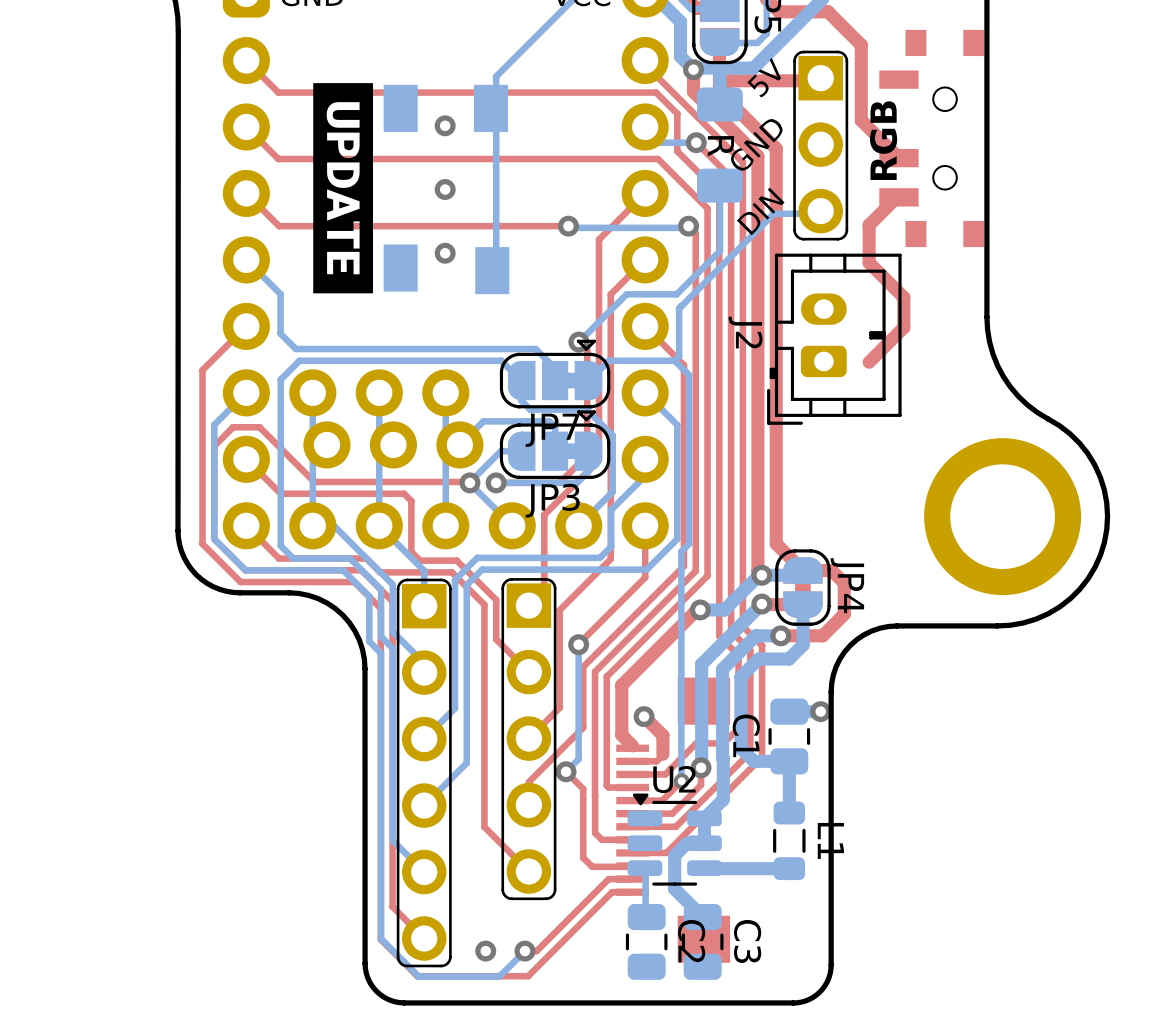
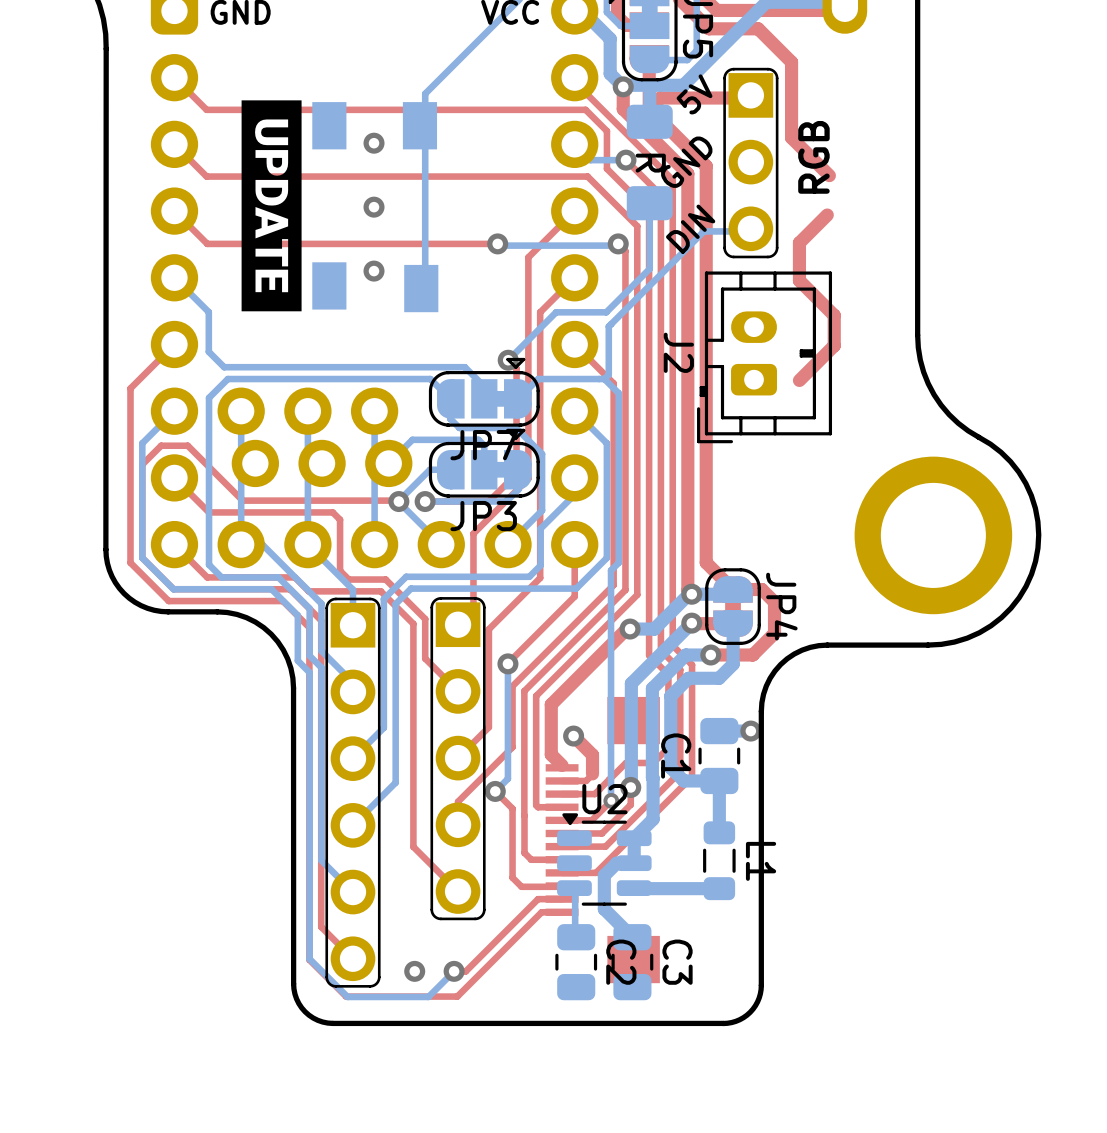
part: (931, 138) -> none

